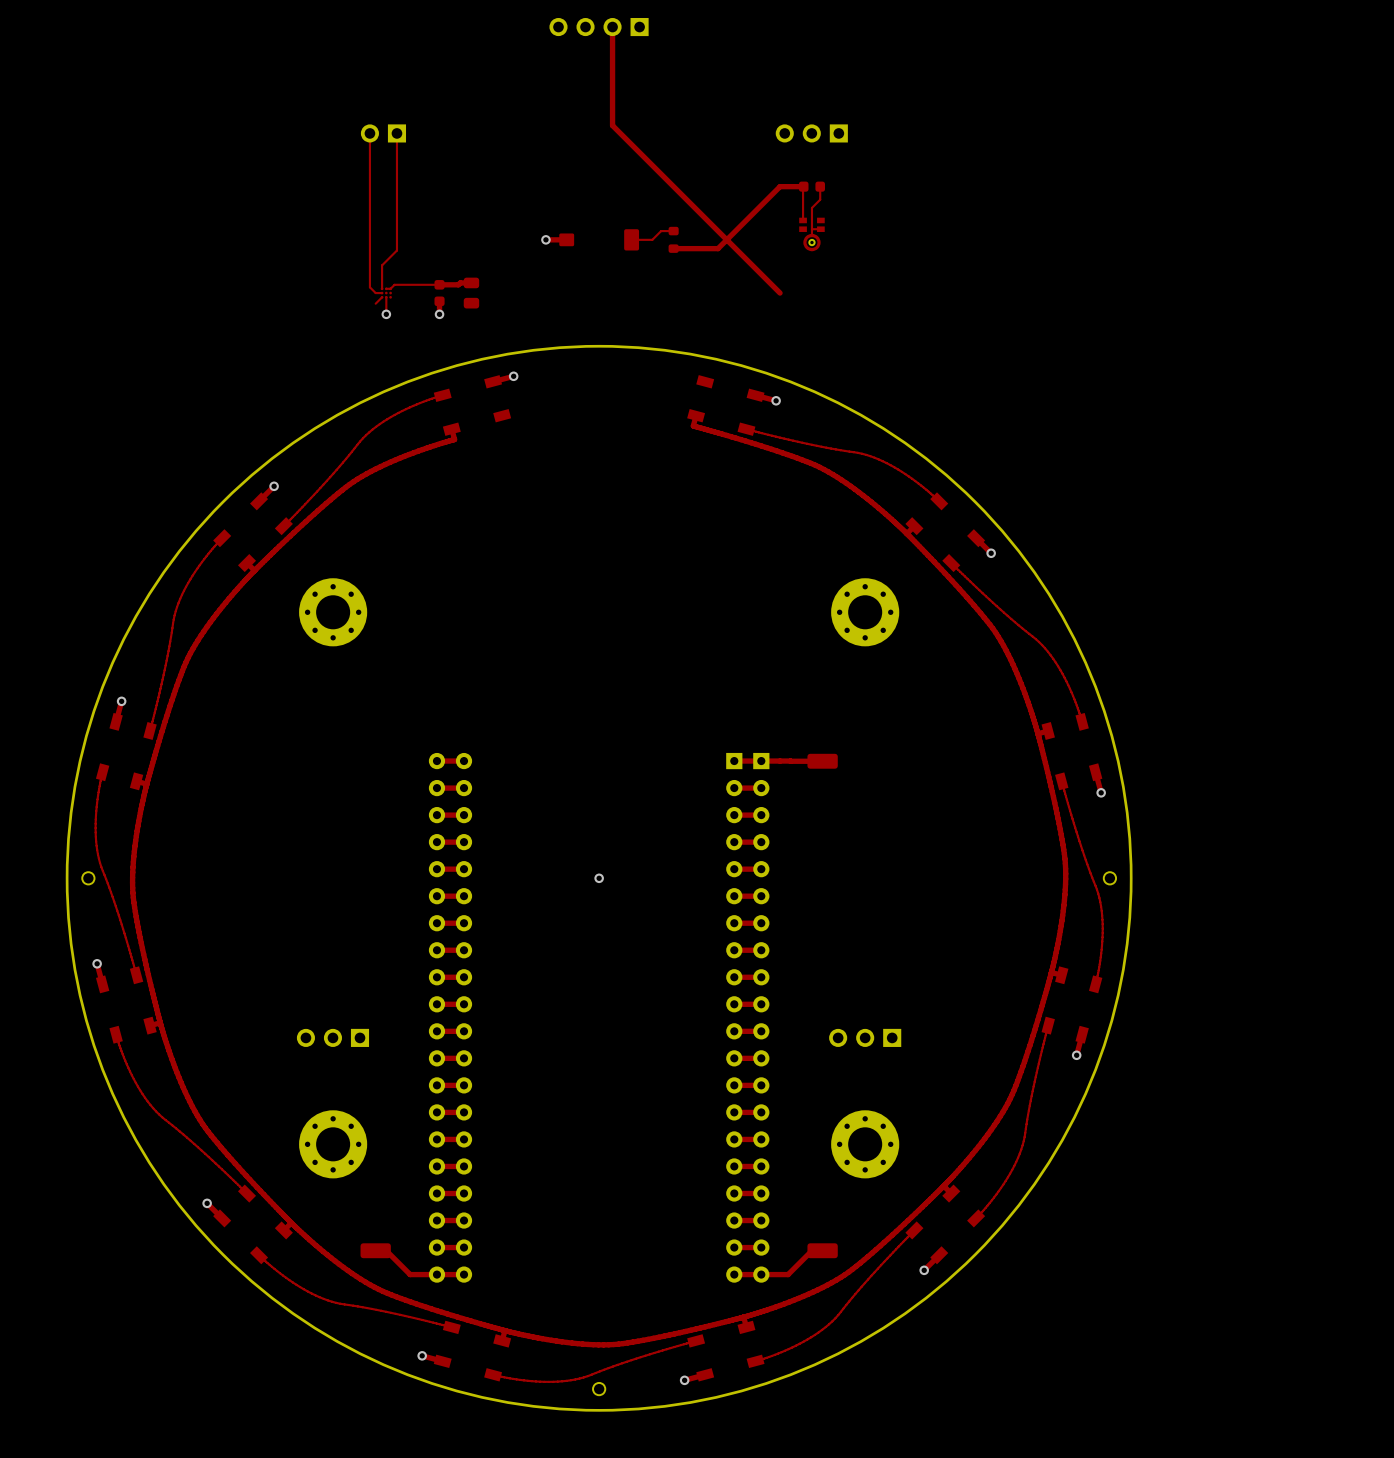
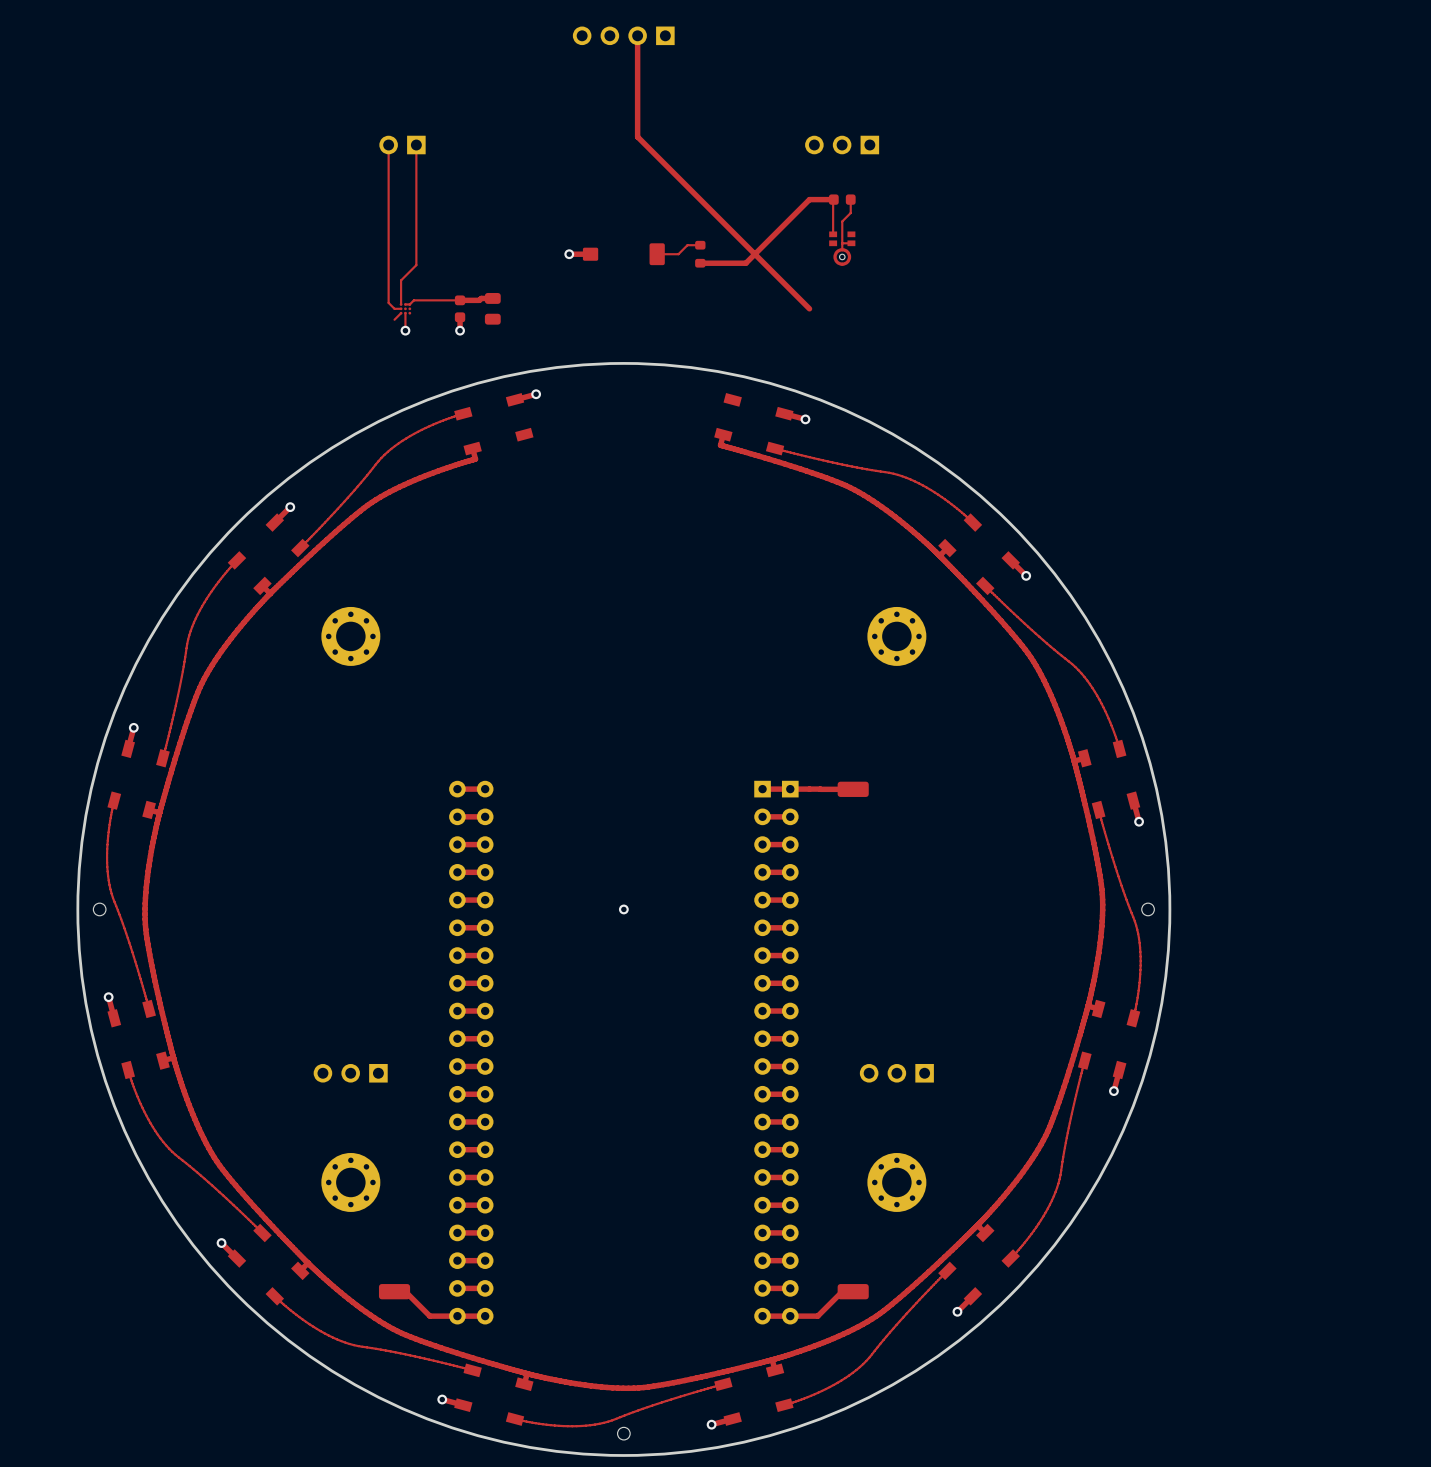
part footprint: [299, 578, 368, 647] -> [321, 606, 381, 666]
part footprint: [831, 578, 900, 647] -> [867, 606, 927, 666]
part footprint: [299, 1110, 368, 1179] -> [321, 1152, 381, 1212]
part footprint: [831, 1110, 900, 1179] -> [867, 1152, 927, 1212]

